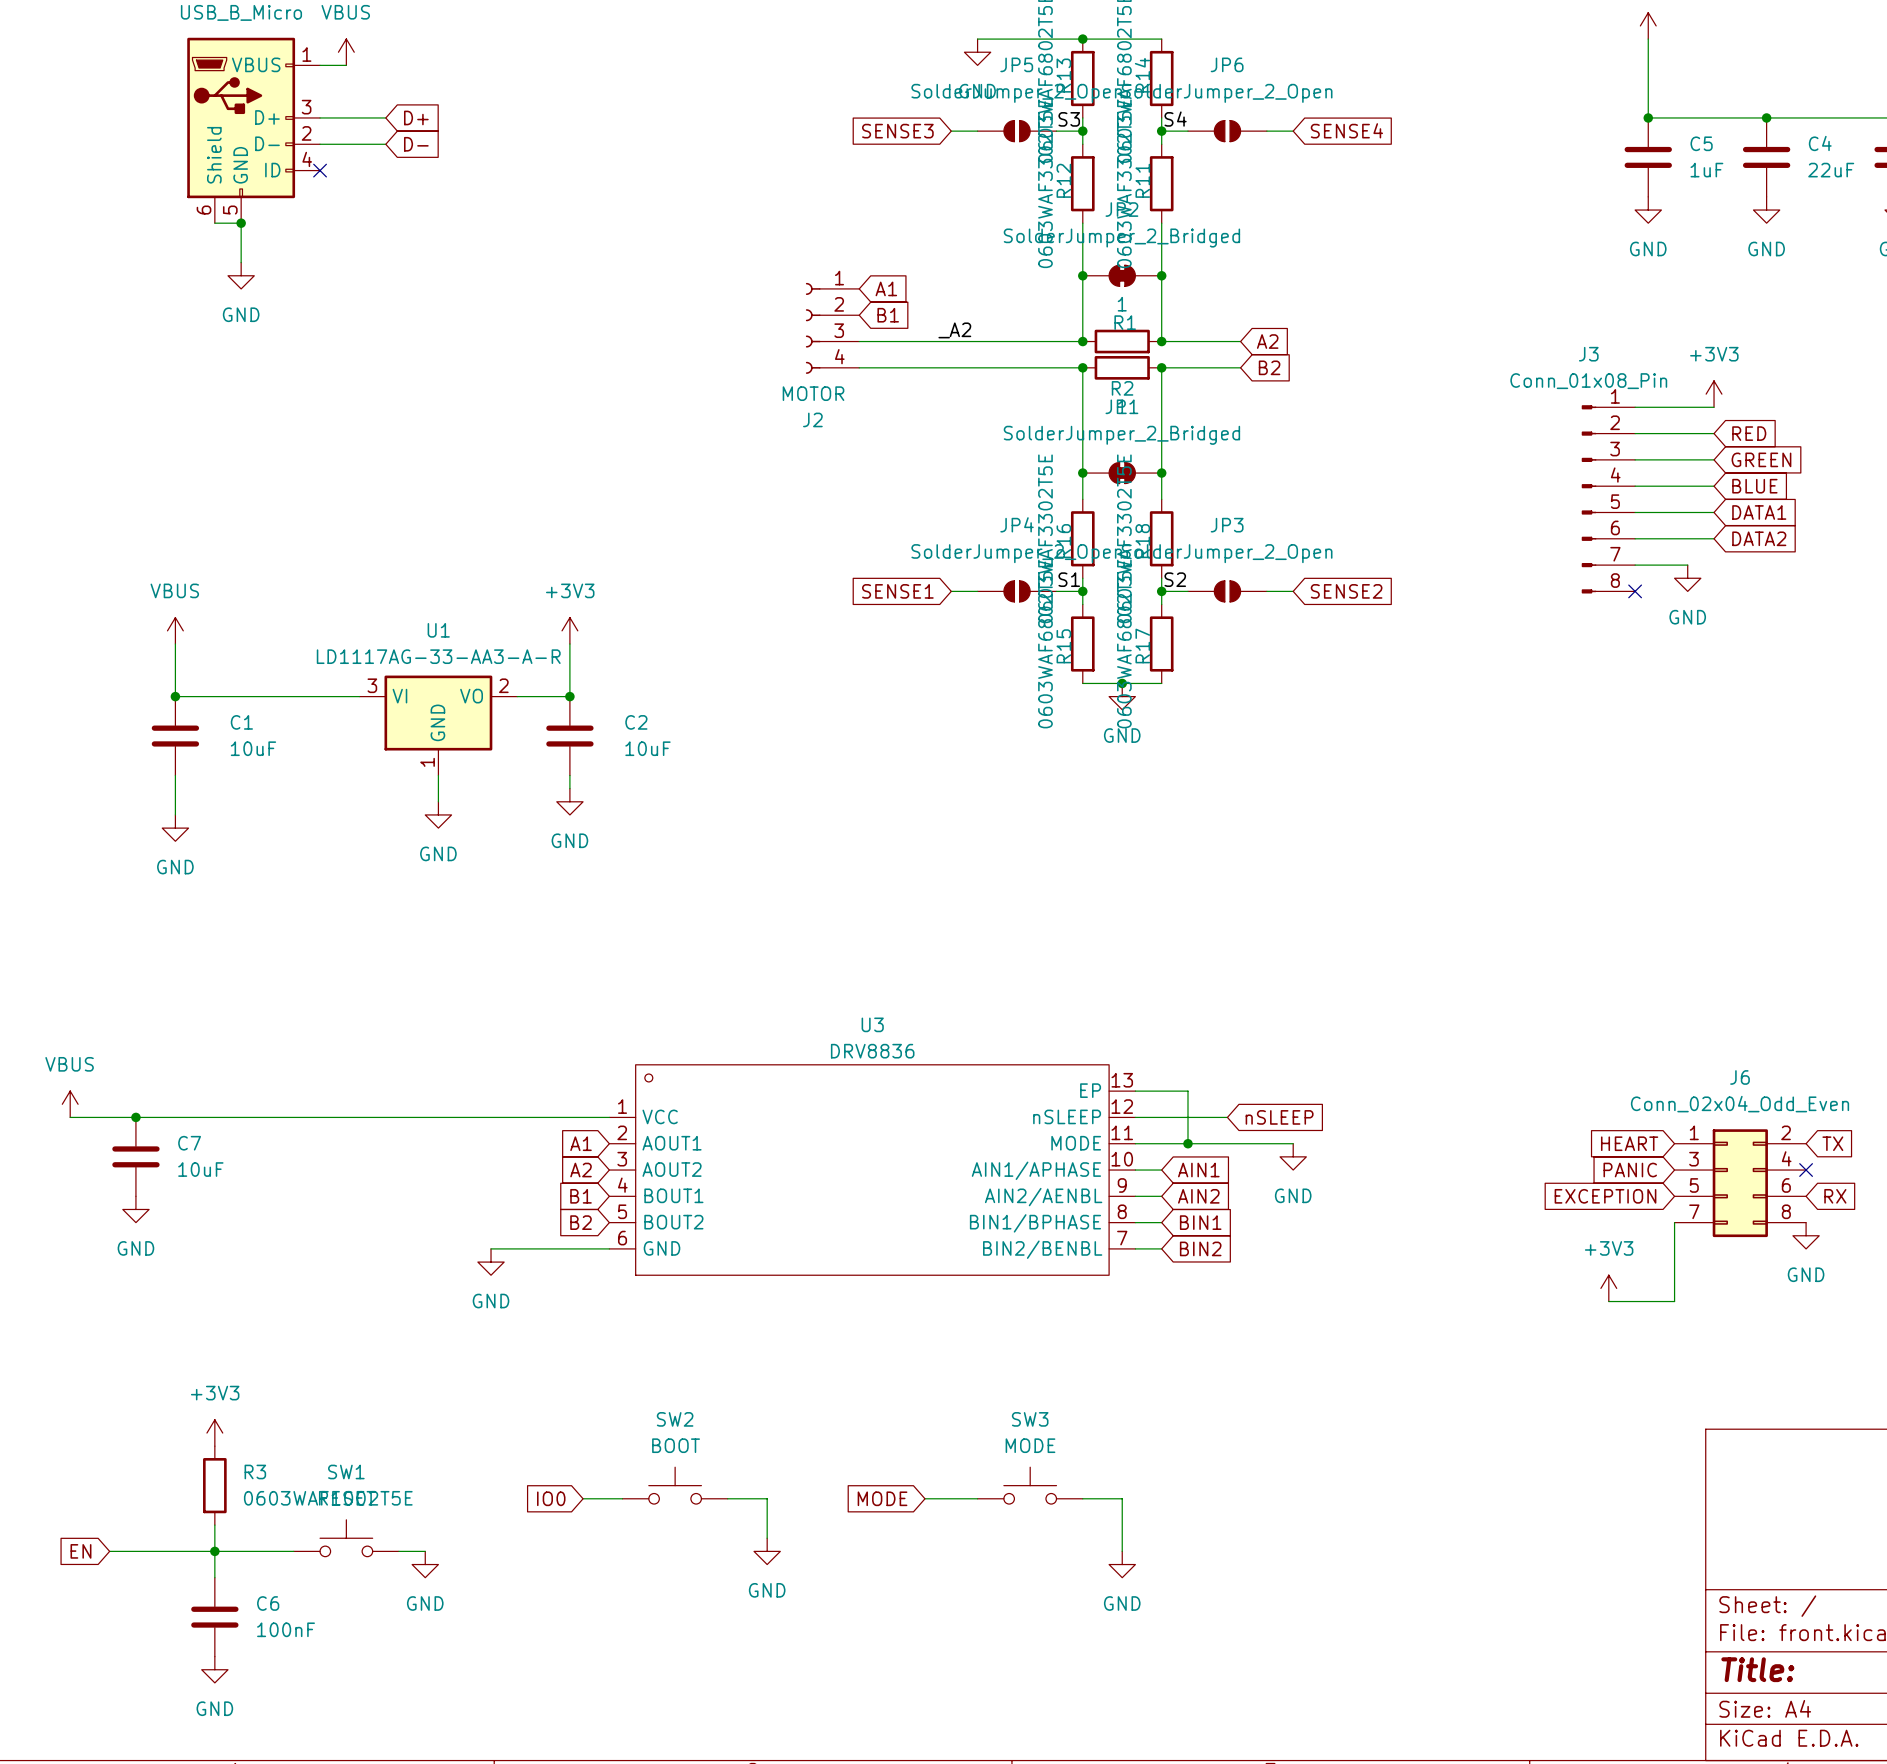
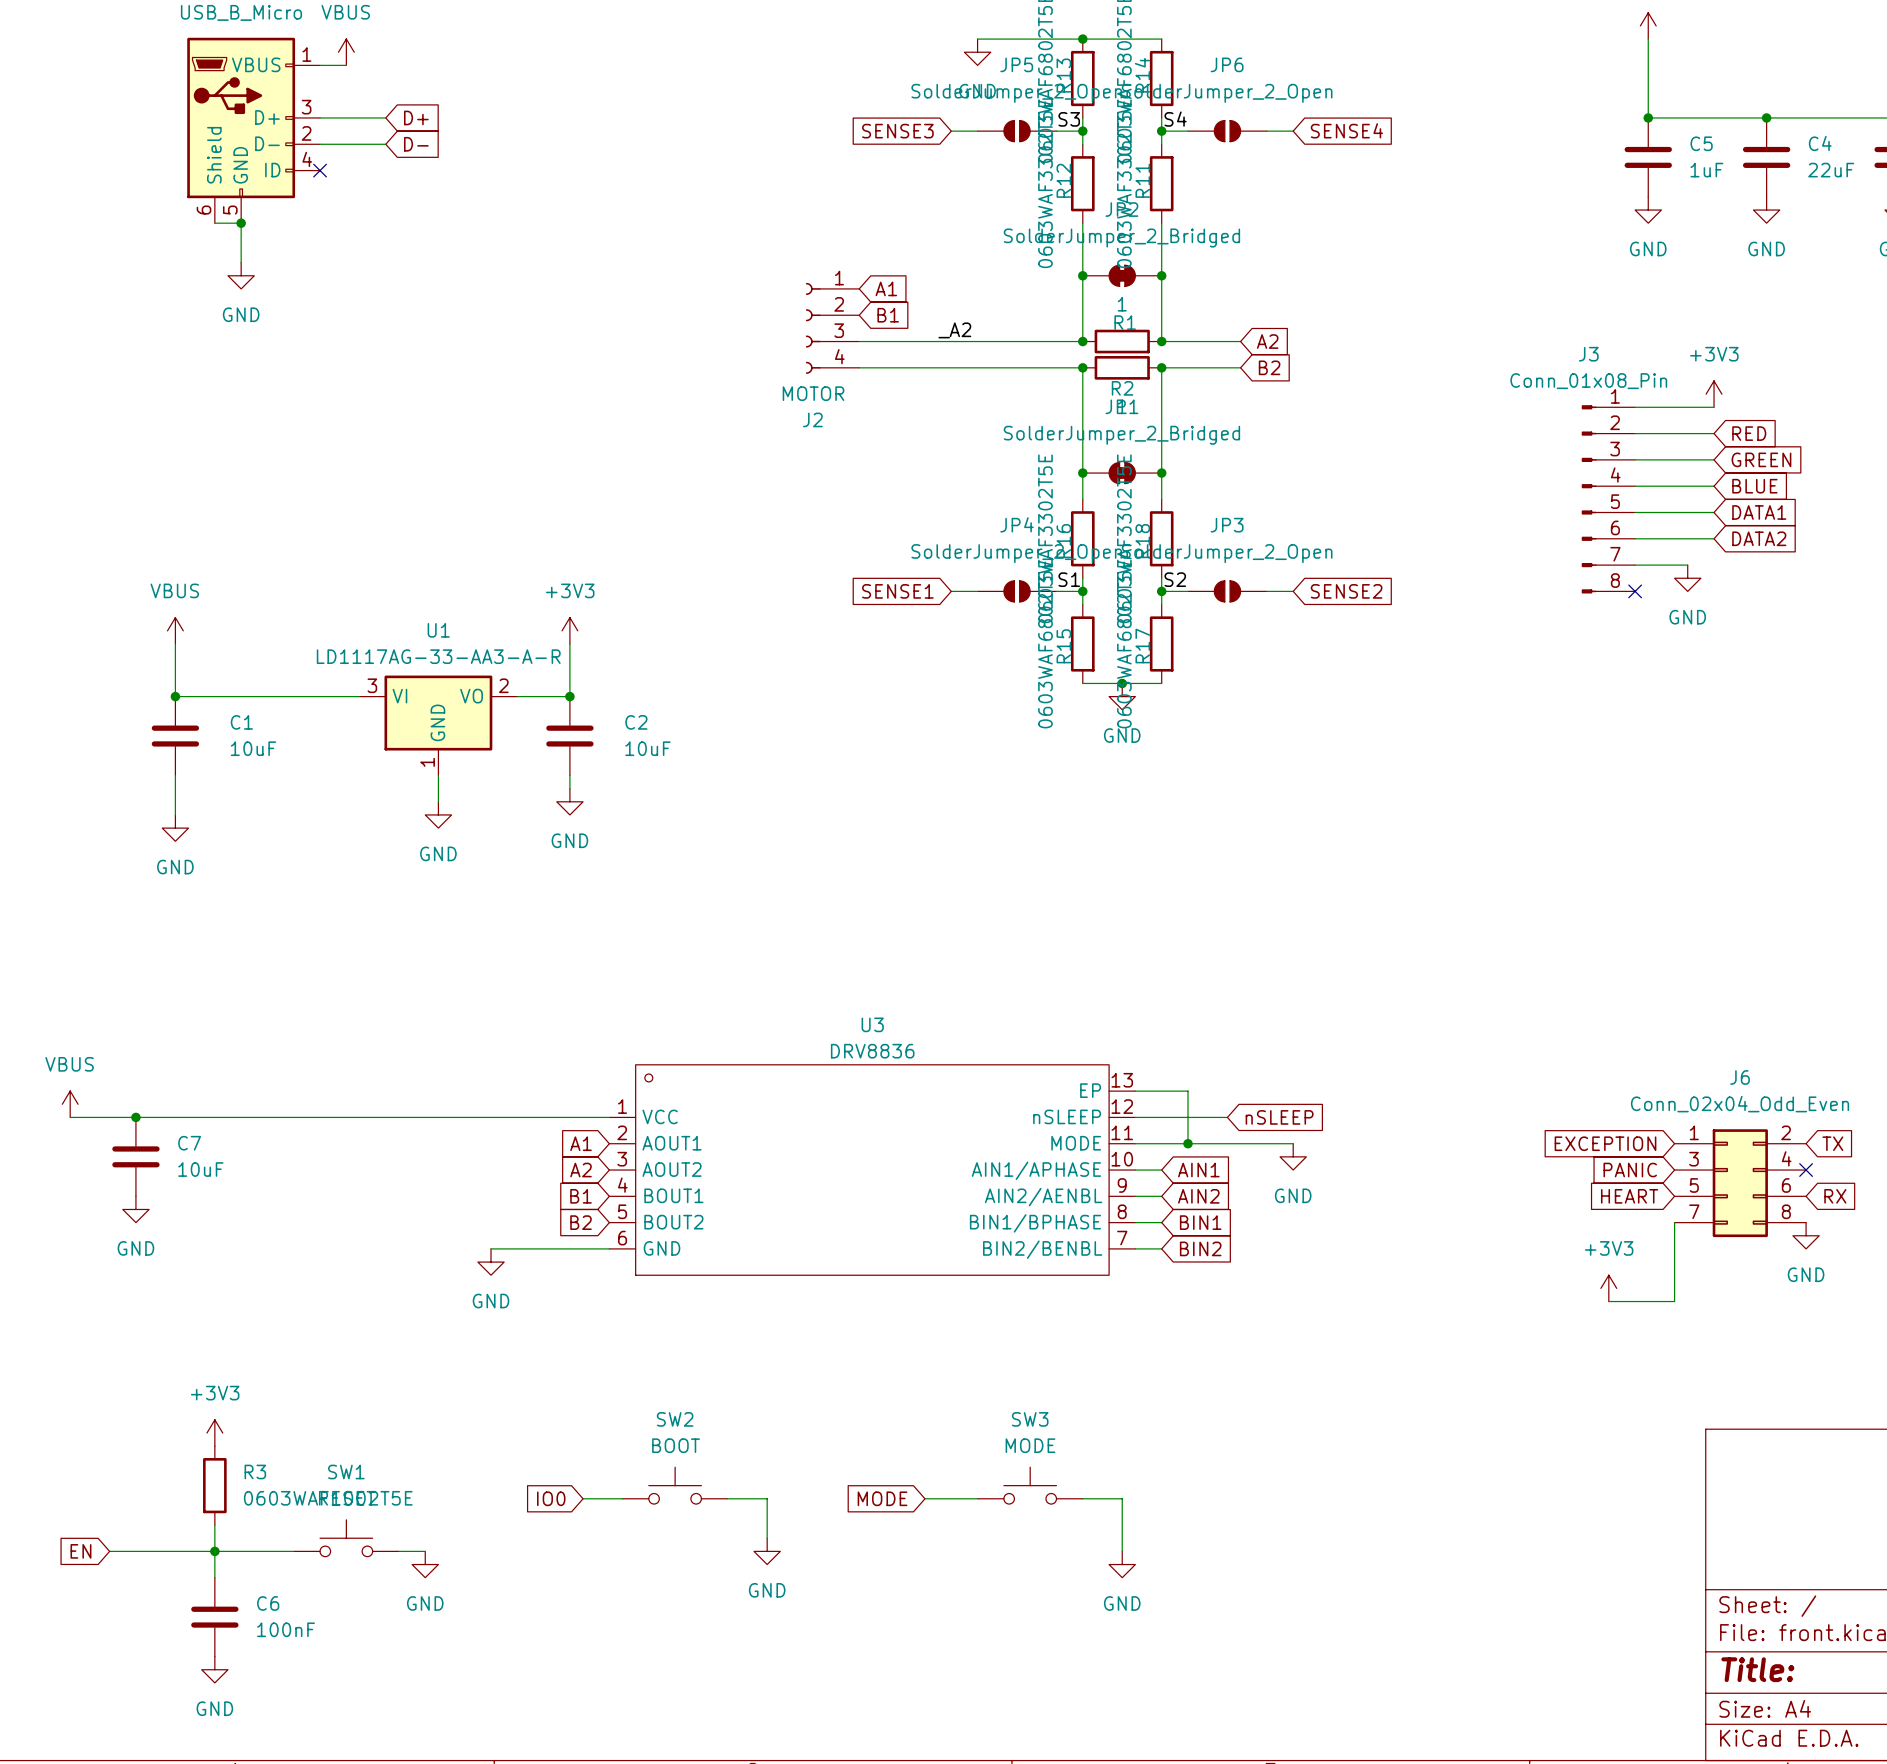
global label: HEART (1629, 1143) -> EXCEPTION (1605, 1143)
global label: EXCEPTION (1605, 1196) -> HEART (1629, 1196)

